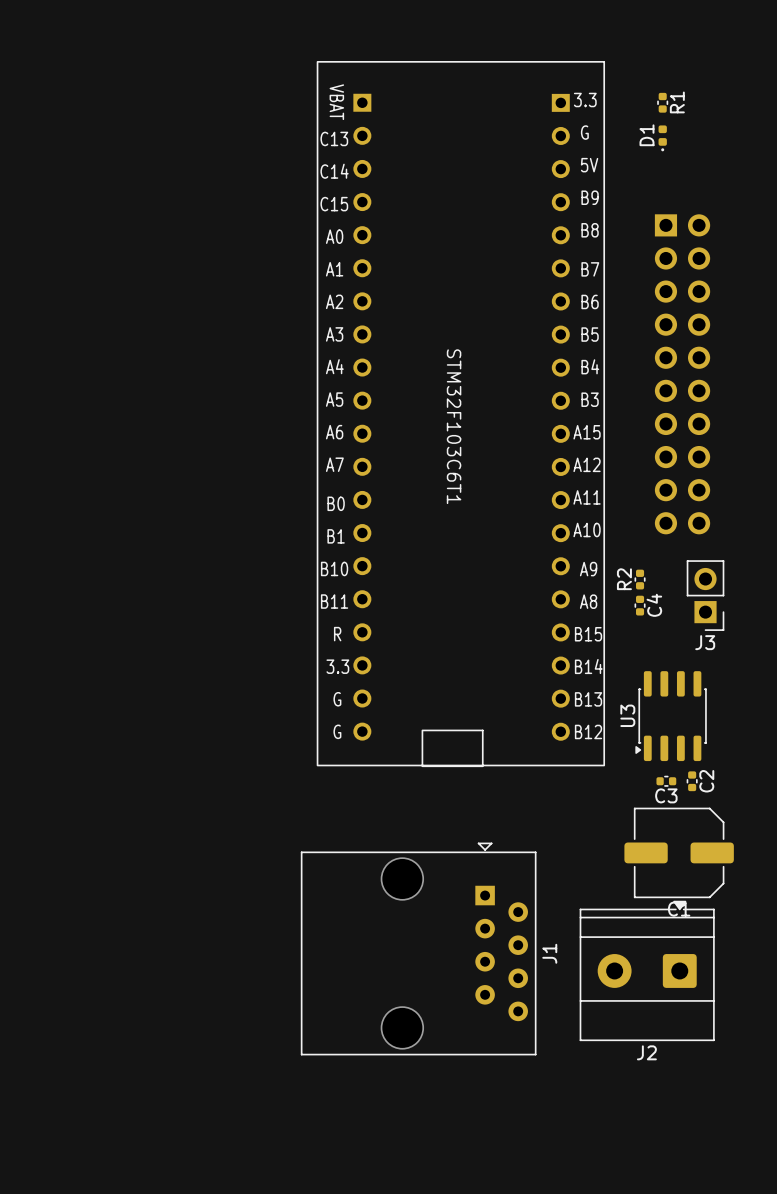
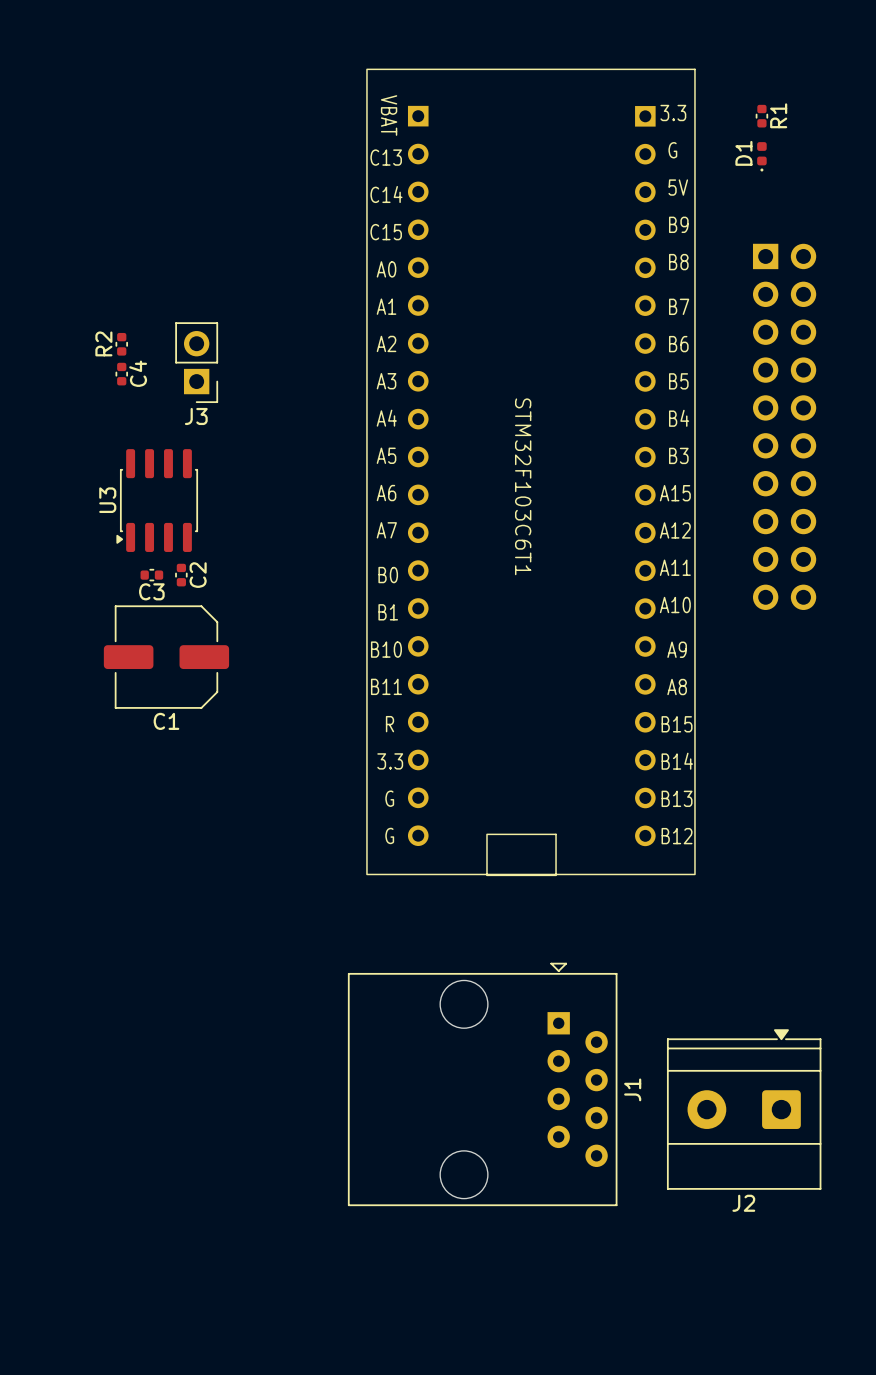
R2 position: (640, 579) -> (121, 344)
J3 position: (705, 595) -> (196, 362)
C4 position: (640, 605) -> (121, 374)
U3 position: (671, 716) -> (157, 500)
C3 position: (666, 781) -> (151, 575)
C2 position: (692, 781) -> (181, 575)
C1 position: (679, 852) -> (166, 657)

